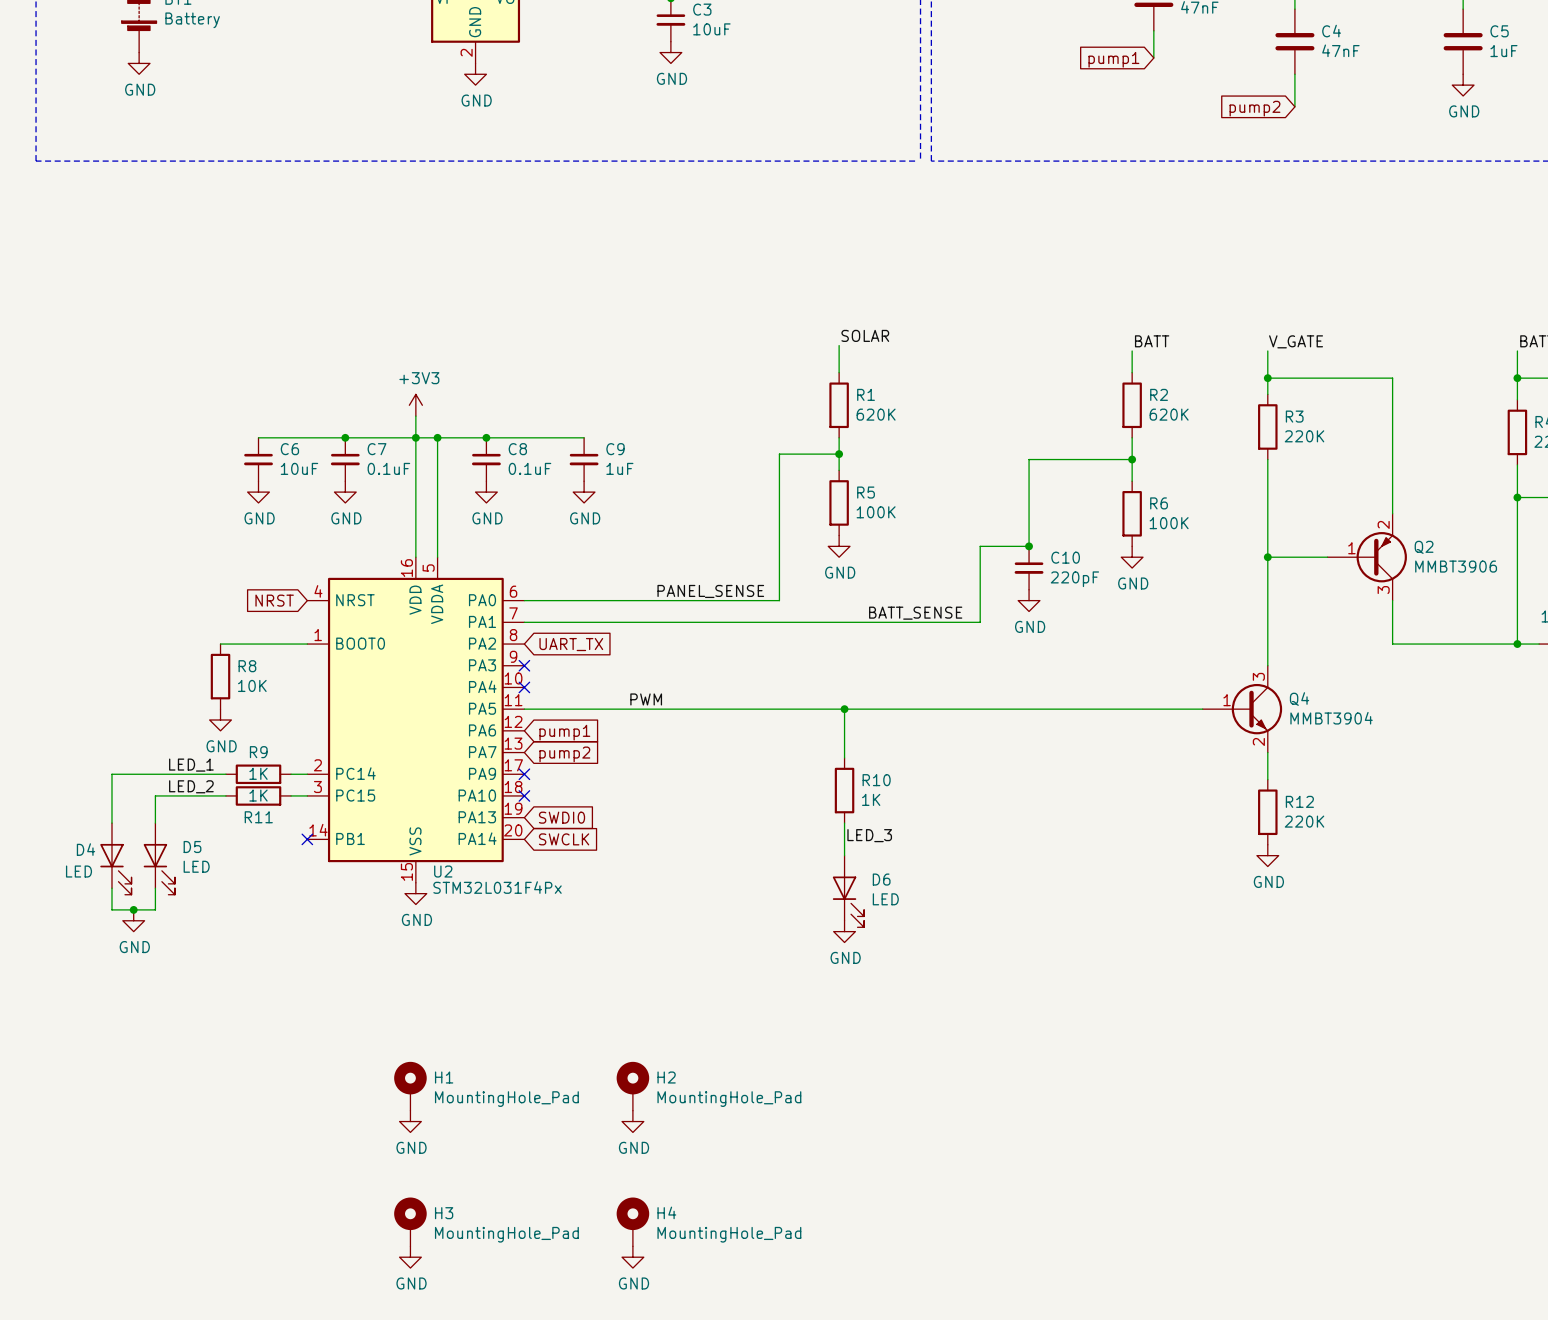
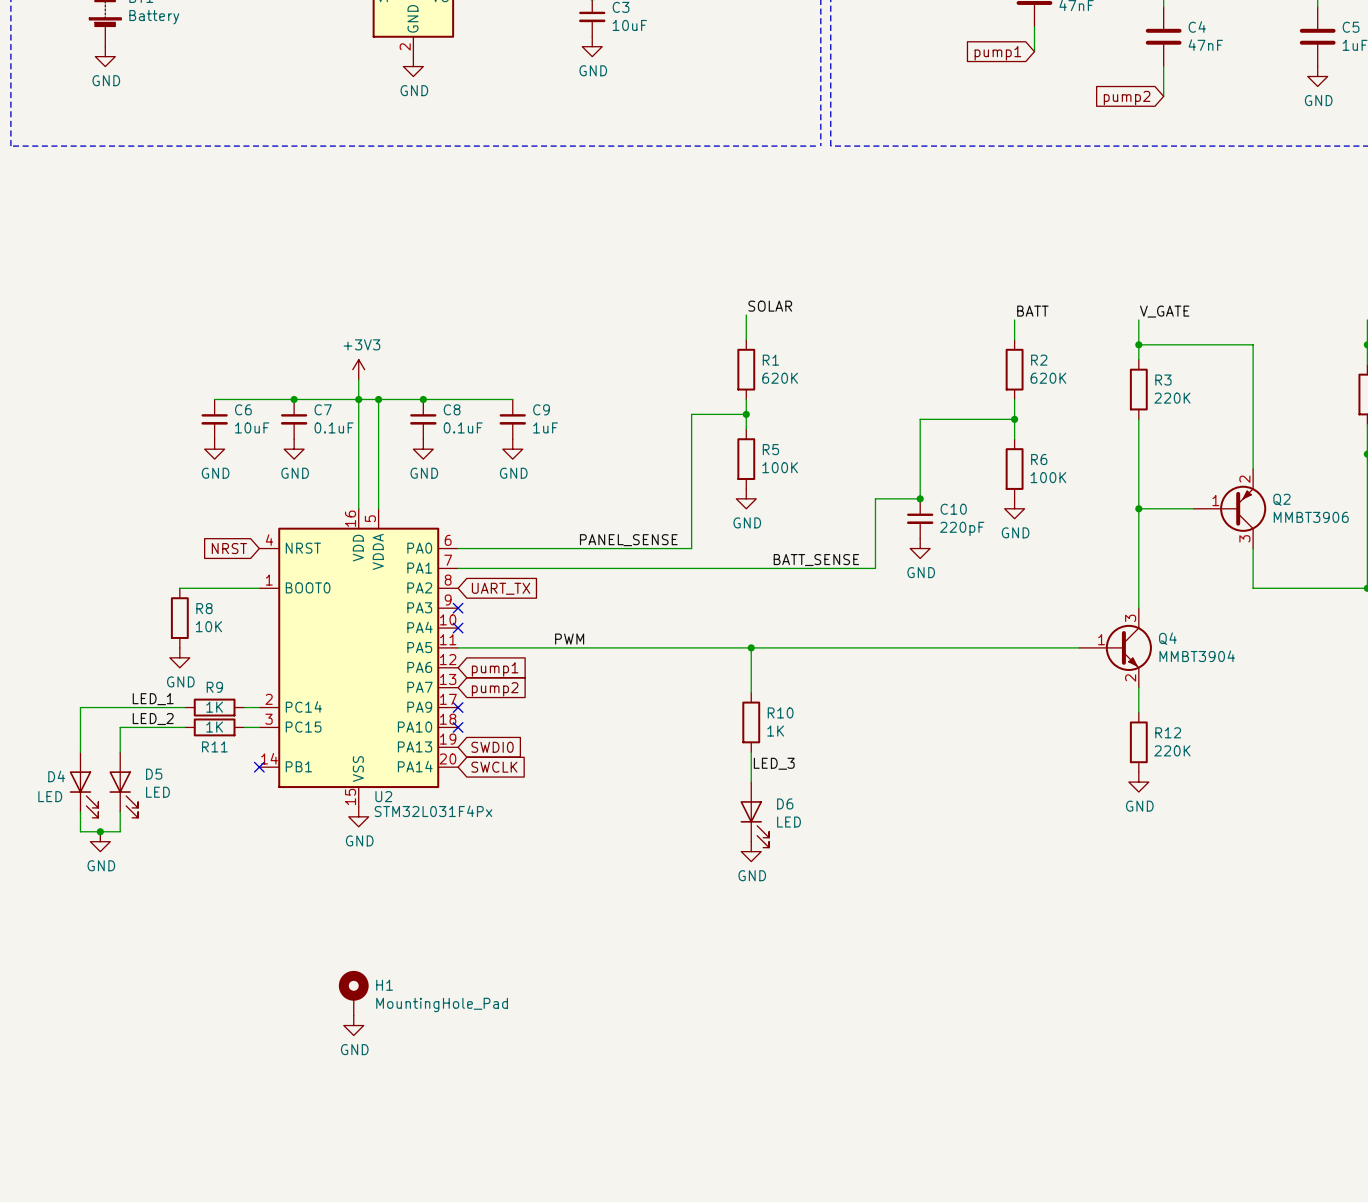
H2: MountingHole_Pad (632, 1086) -> none
power symbol: GND (632, 1121) -> none
H3: MountingHole_Pad (410, 1221) -> none
H4: MountingHole_Pad (632, 1221) -> none
power symbol: GND (410, 1257) -> none
power symbol: GND (632, 1257) -> none

